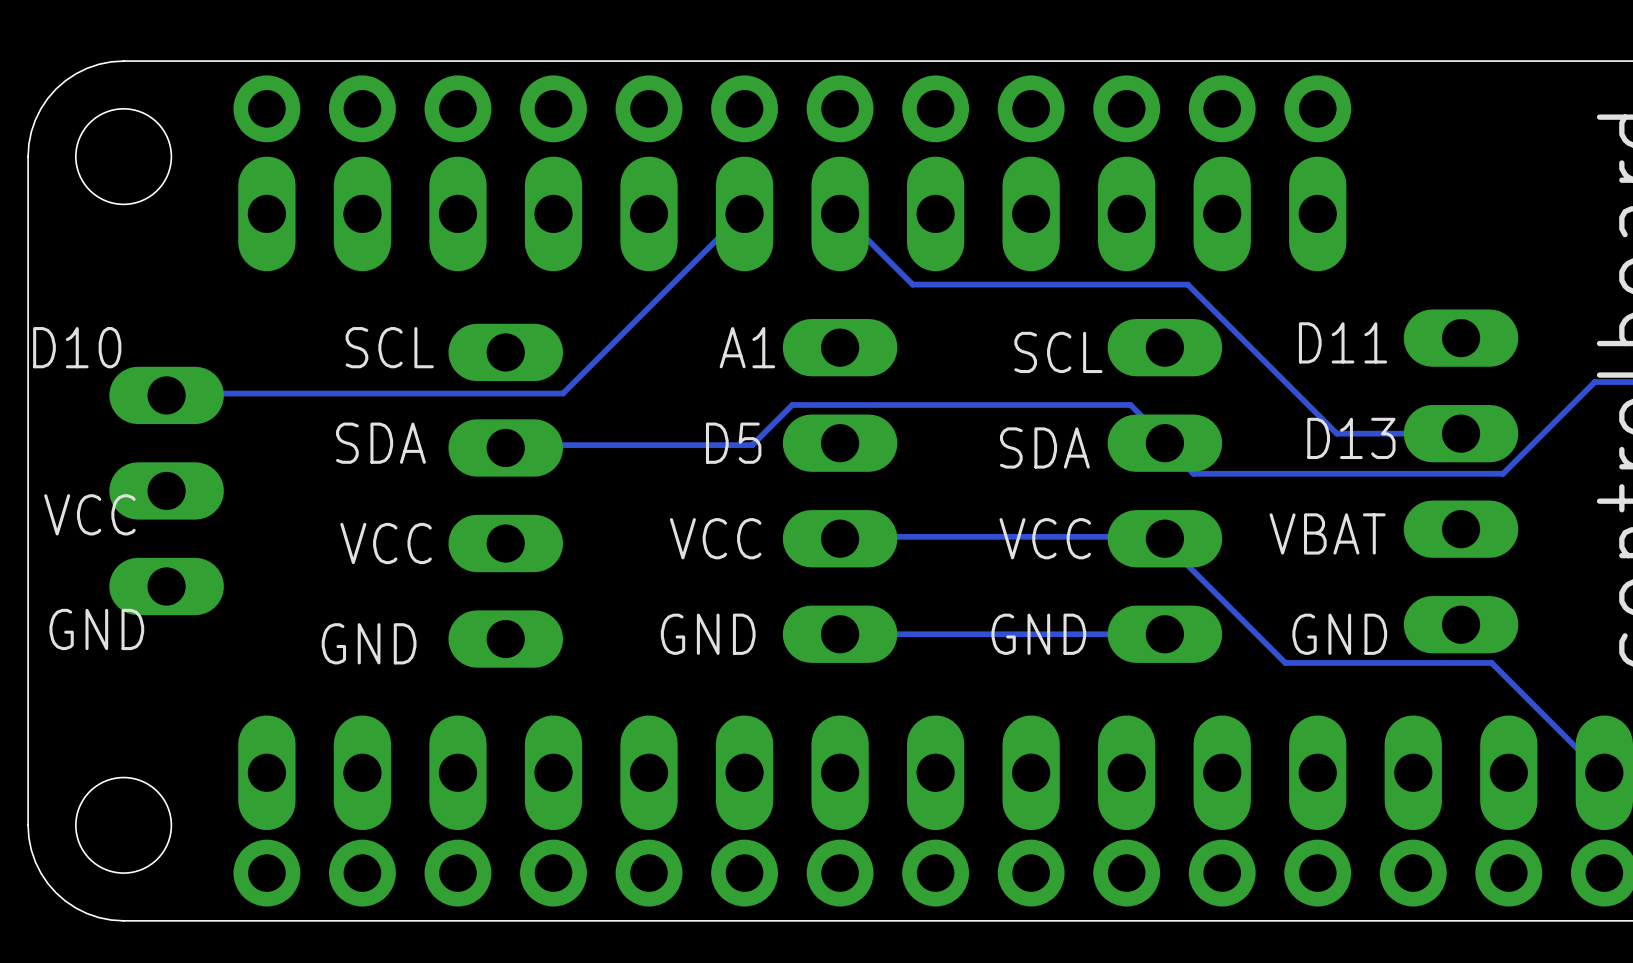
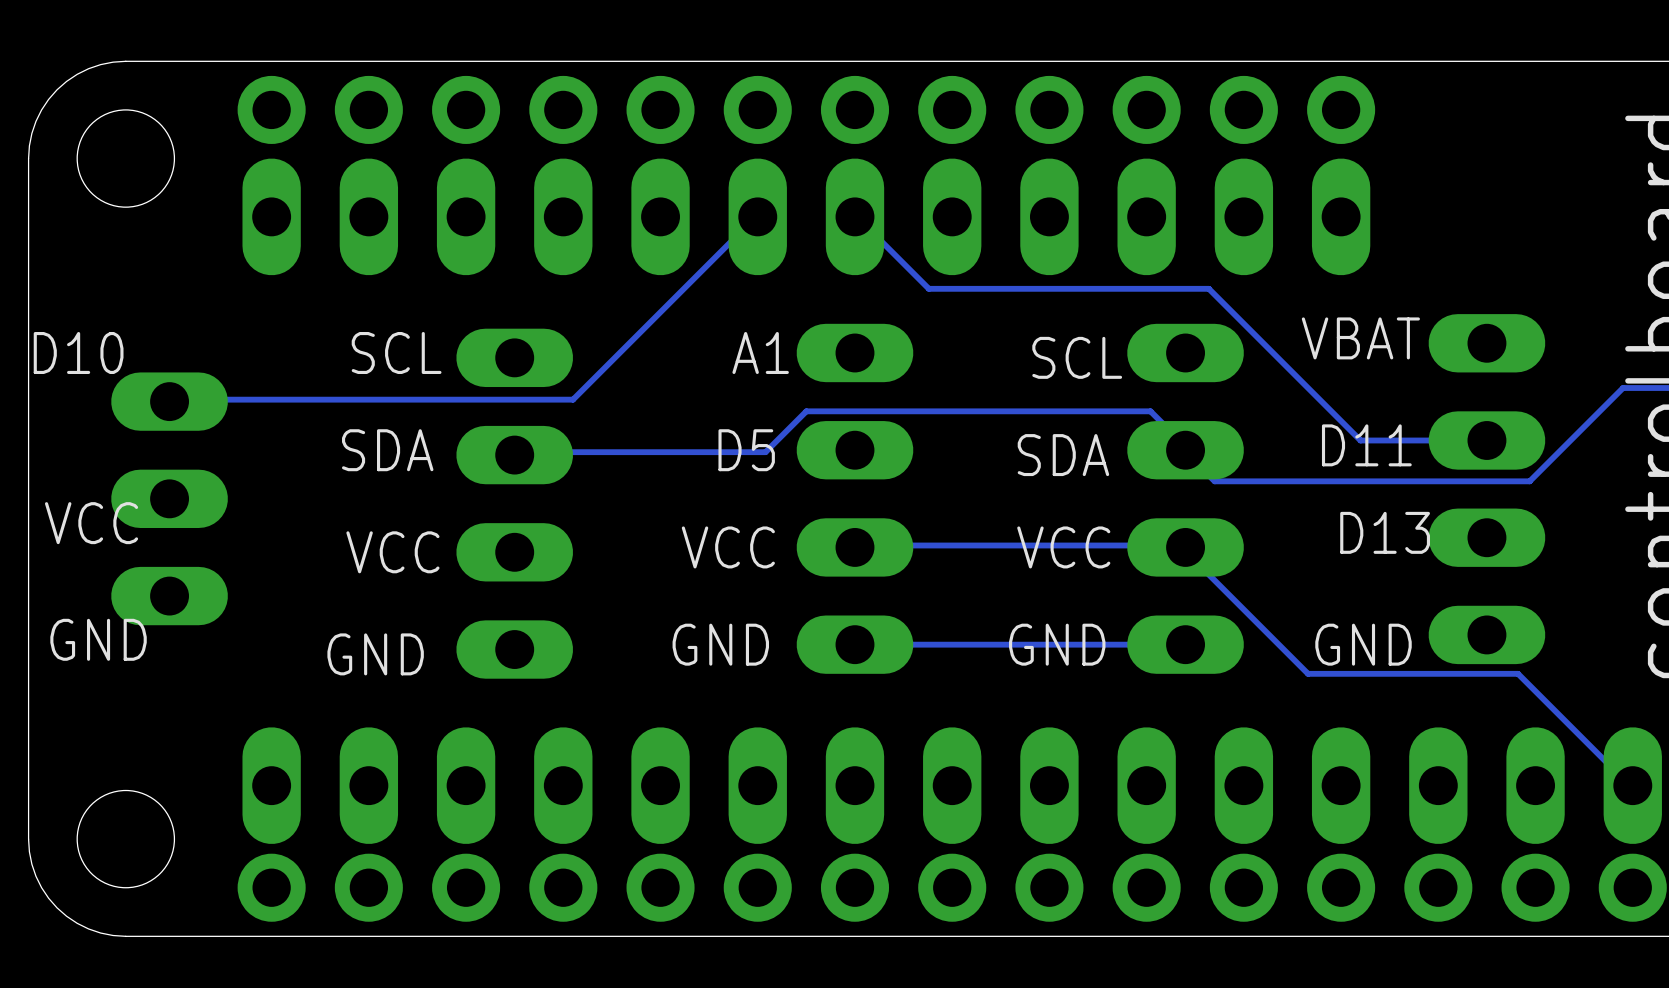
text position: D11 (1343, 342) -> D11 (1366, 445)
text position: D13 (1351, 438) -> D13 (1385, 532)
text position: VBAT (1327, 533) -> VBAT (1360, 338)

